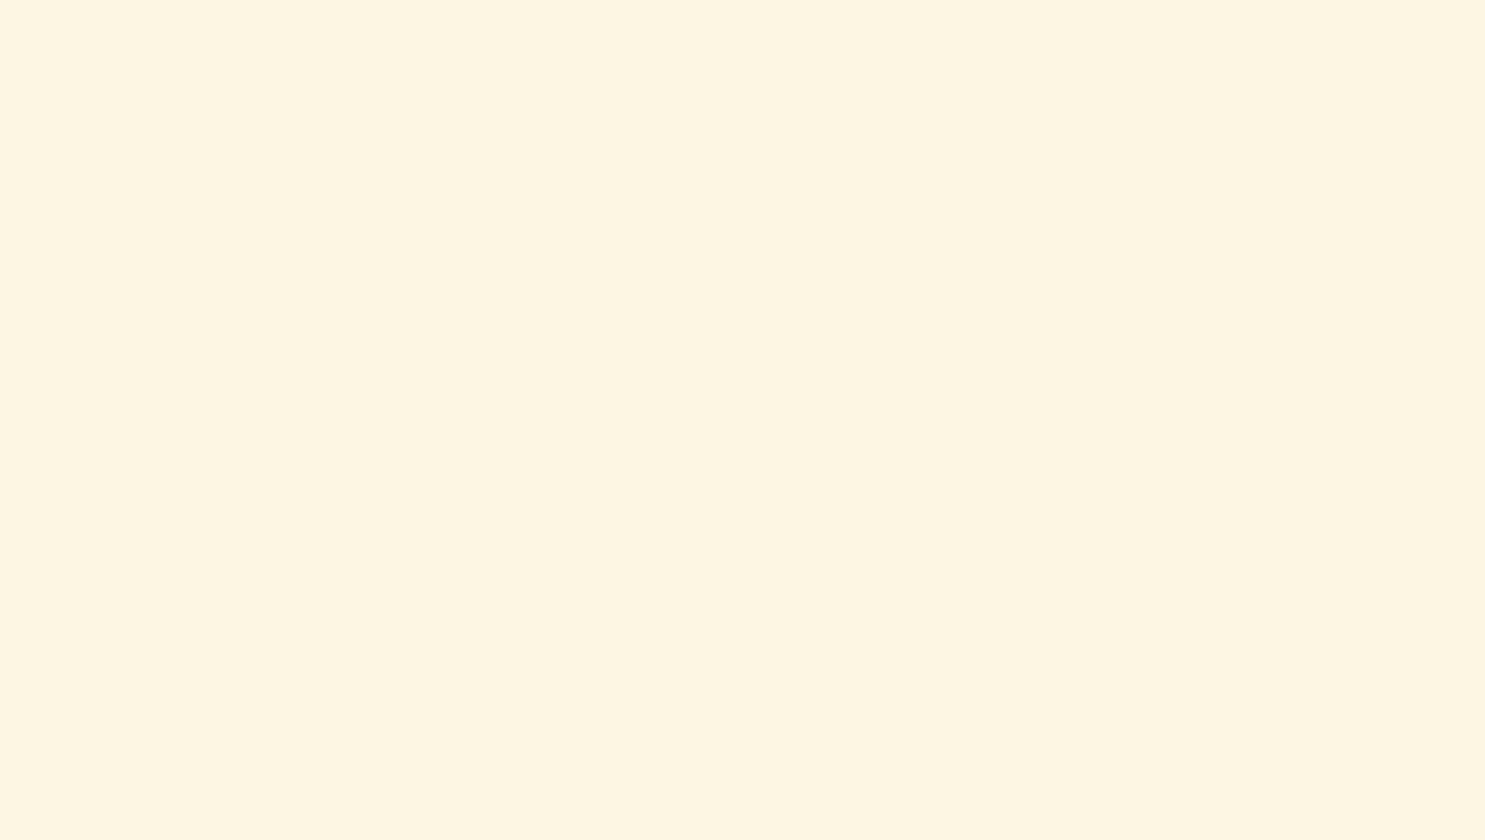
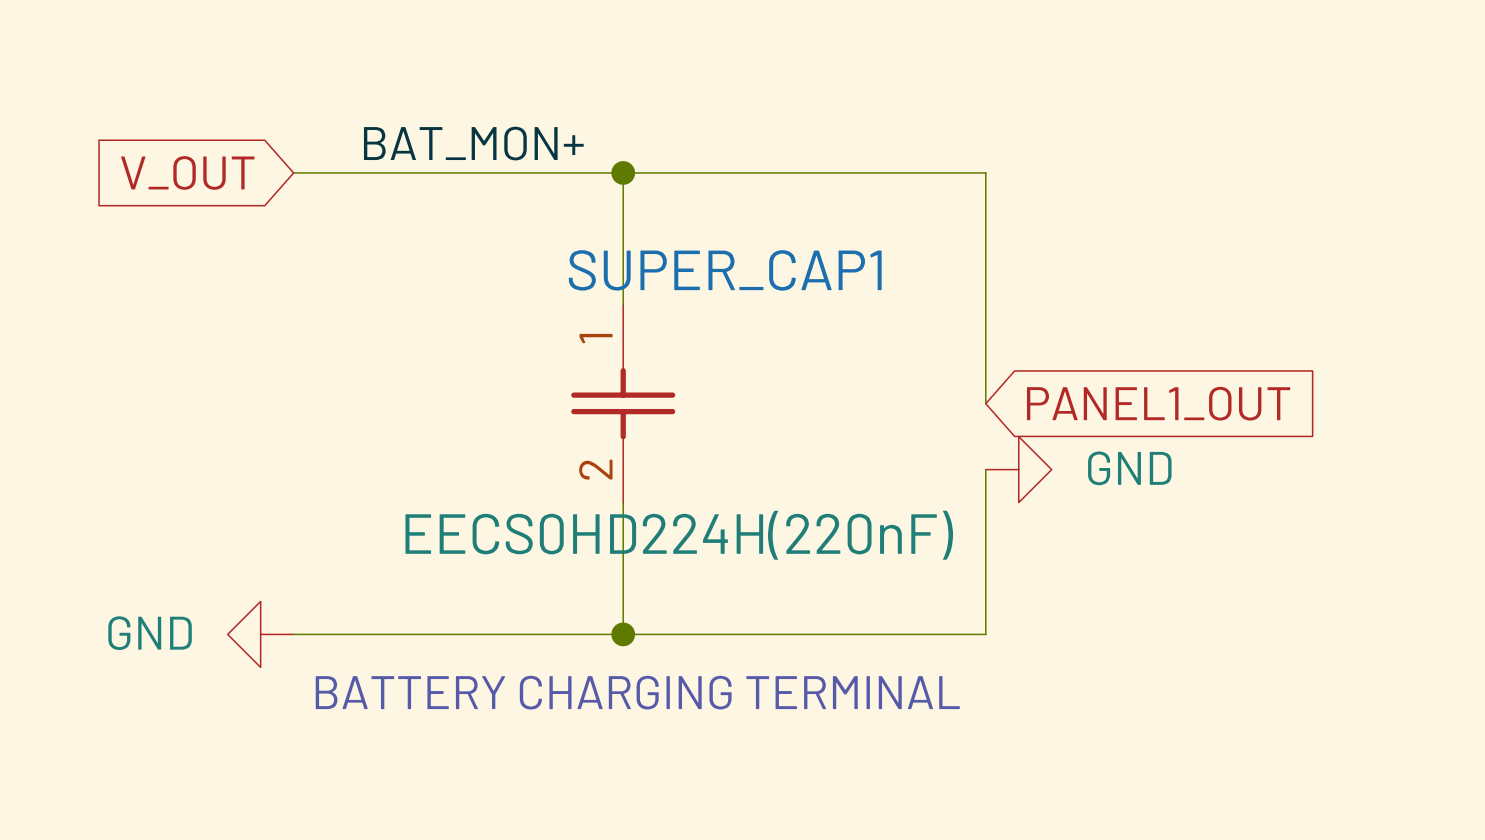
label: none -> BAT_MON+ (473, 143)
global label: none -> V_OUT (187, 172)
wire: none -> (293, 172) (985, 172) (985, 403)
wire: none -> (623, 172) (623, 304)
junction: none -> (623, 172)
SUPER_CAP1: none -> EECS0HD224H(220nF) (623, 403)
global label: none -> PANEL1_OUT (1158, 403)
wire: none -> (985, 469) (985, 634) (293, 634)
power symbol: none -> GND (1018, 469)
wire: none -> (623, 502) (623, 634)
power symbol: none -> GND (260, 634)
junction: none -> (623, 634)
text: none -> BATTERY CHARGING TERMINAL (637, 692)

